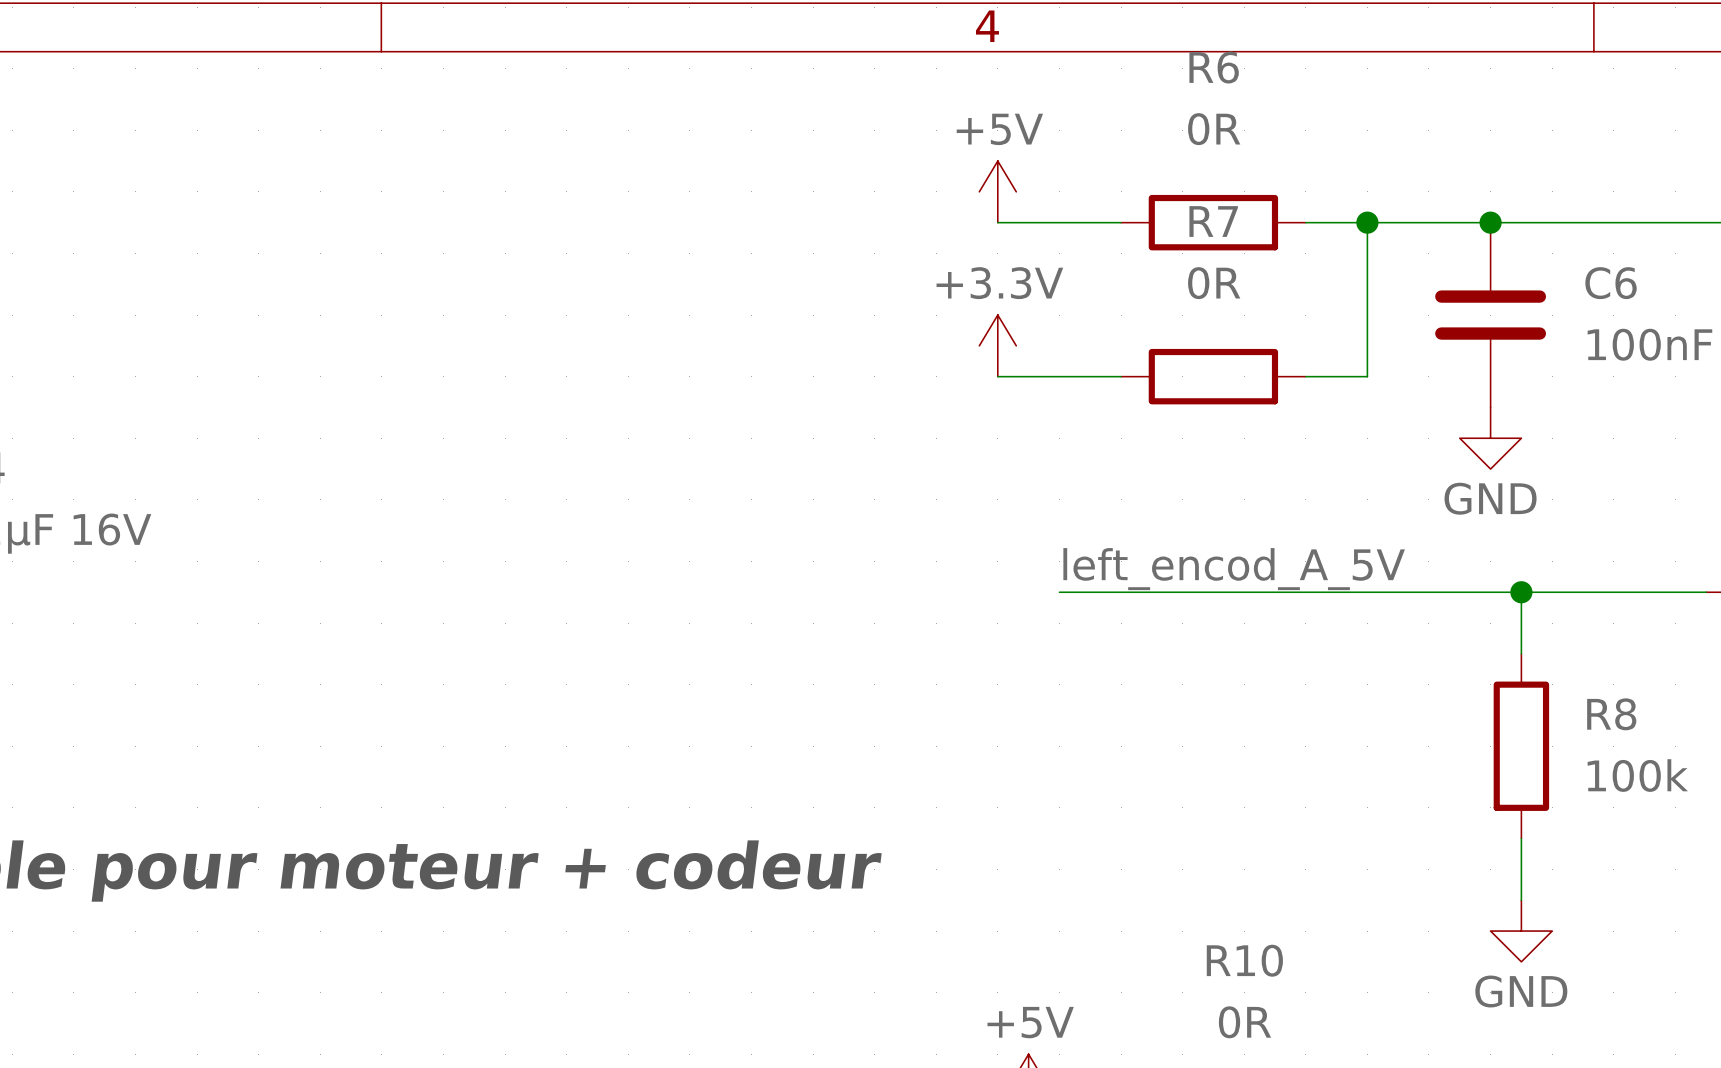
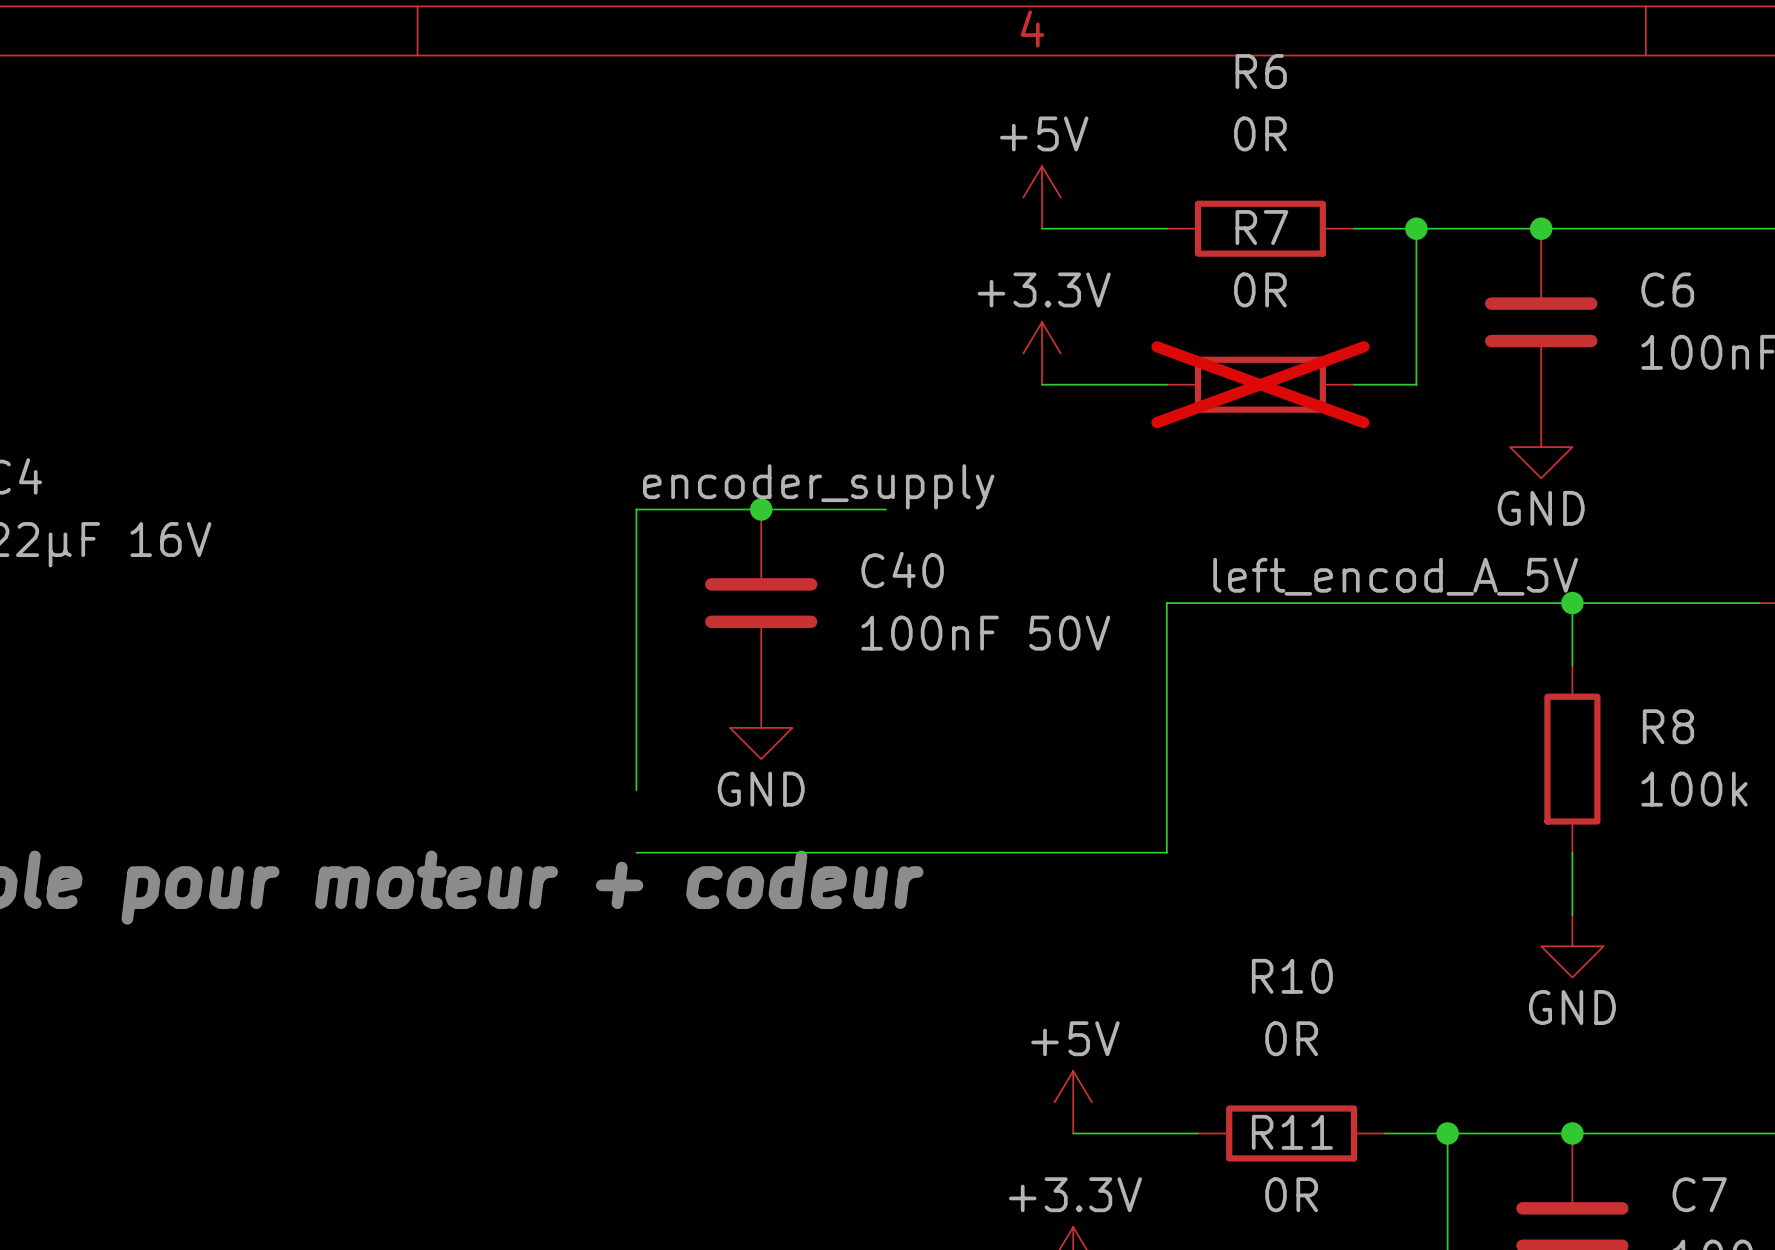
R7 do-not-place cross: none -> (1260, 384)
label: none -> encoder_supply (818, 486)
junction: none -> (761, 509)
wire: none -> (886, 509) (636, 509) (636, 790)
label position: left_encod_A_5V (1234, 569) -> left_encod_A_5V (1395, 576)
C40: none -> 100nF 50V (761, 603)
wire: (1059, 592) (1121, 592) -> (636, 852) (1166, 852) (1166, 603)
power symbol: none -> GND (761, 727)

